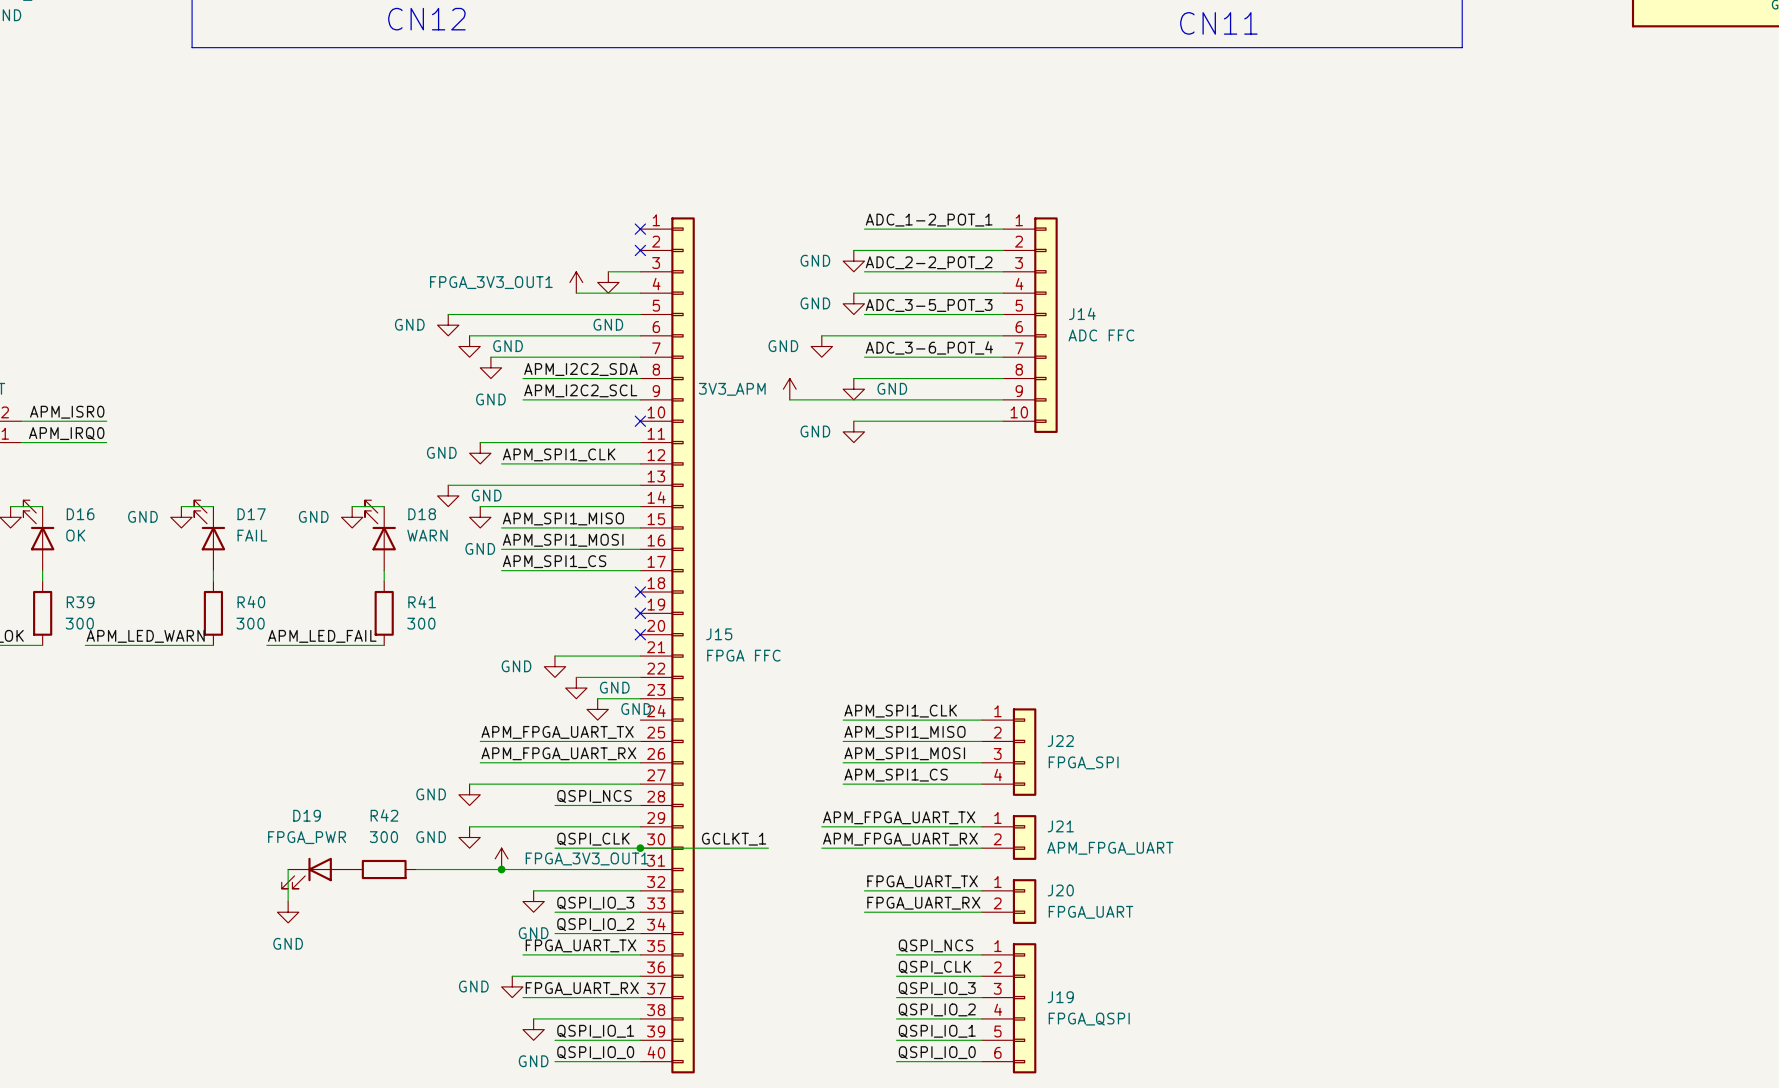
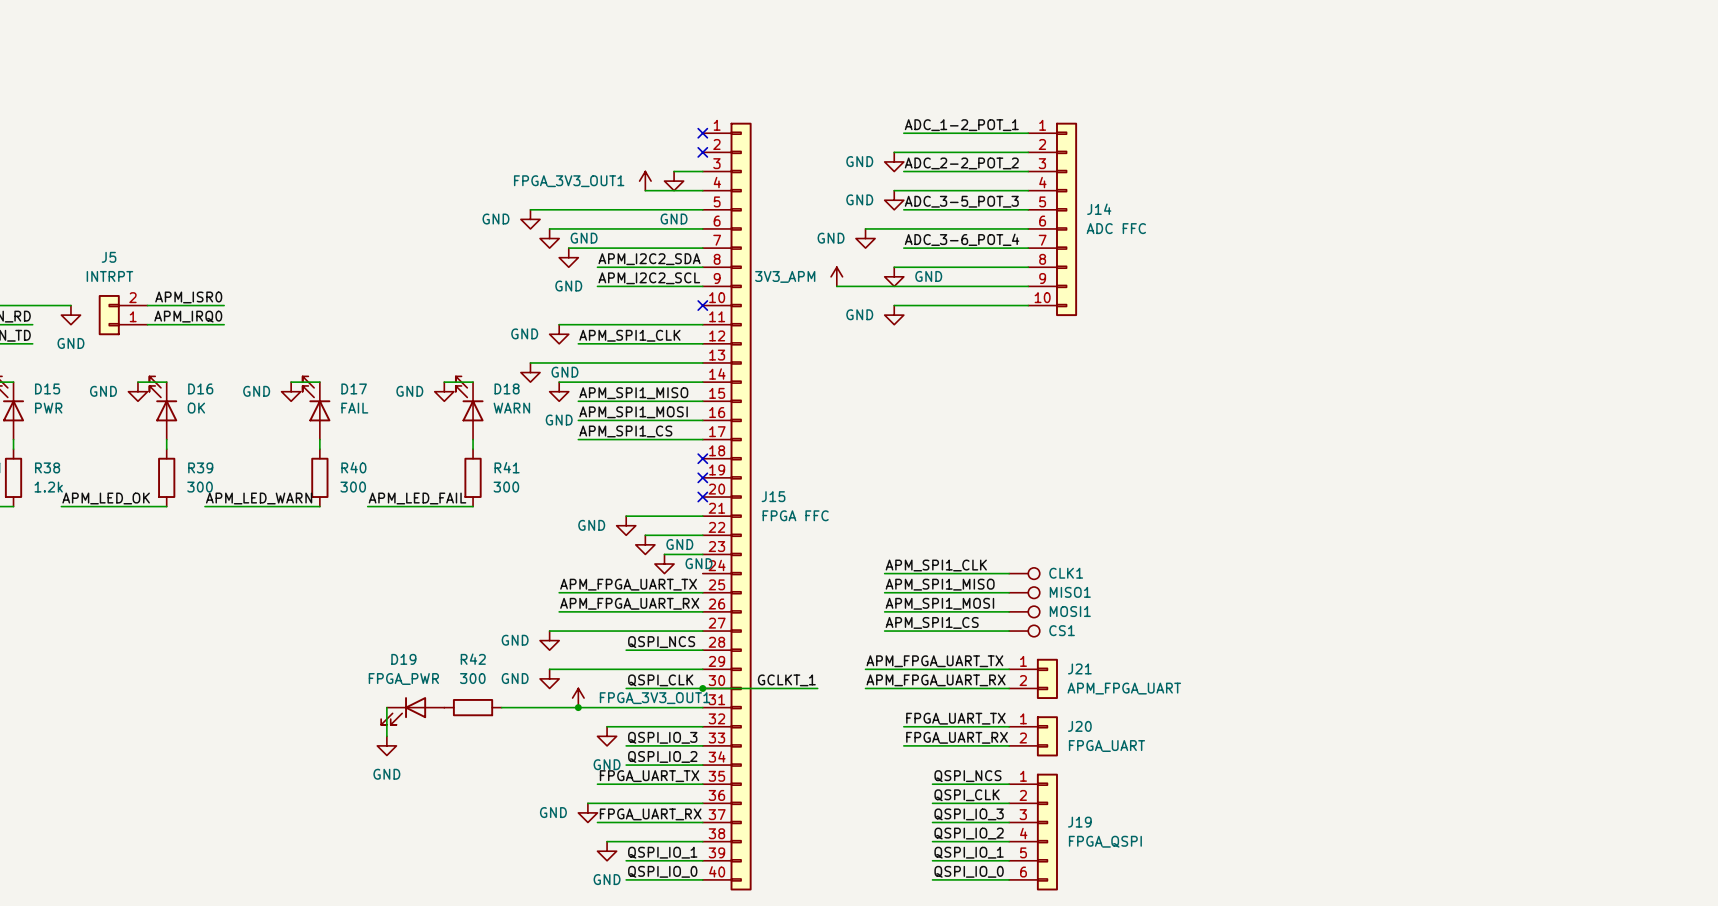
CLK1: none -> (1024, 573)
MISO1: none -> (1024, 592)
J22: FPGA_SPI (1009, 752) -> none
MOSI1: none -> (1024, 611)
CS1: none -> (1024, 631)

